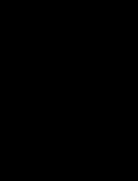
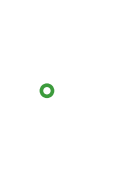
via: none -> (46, 90)

